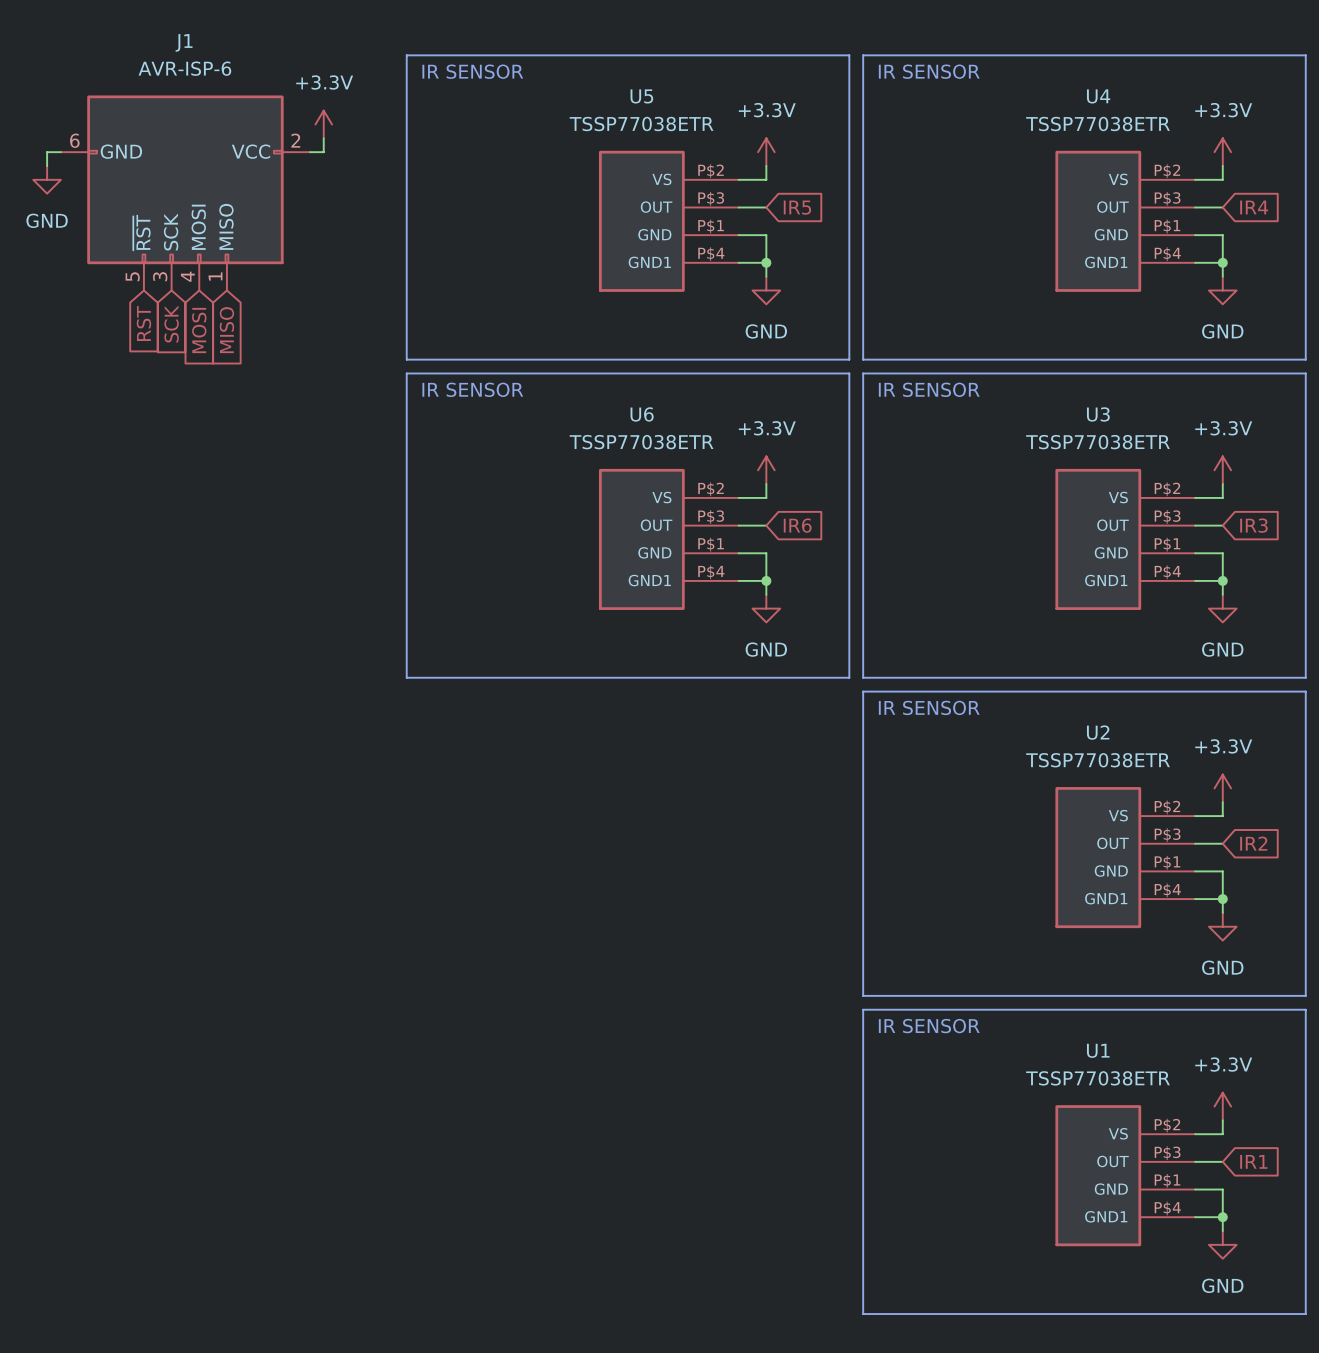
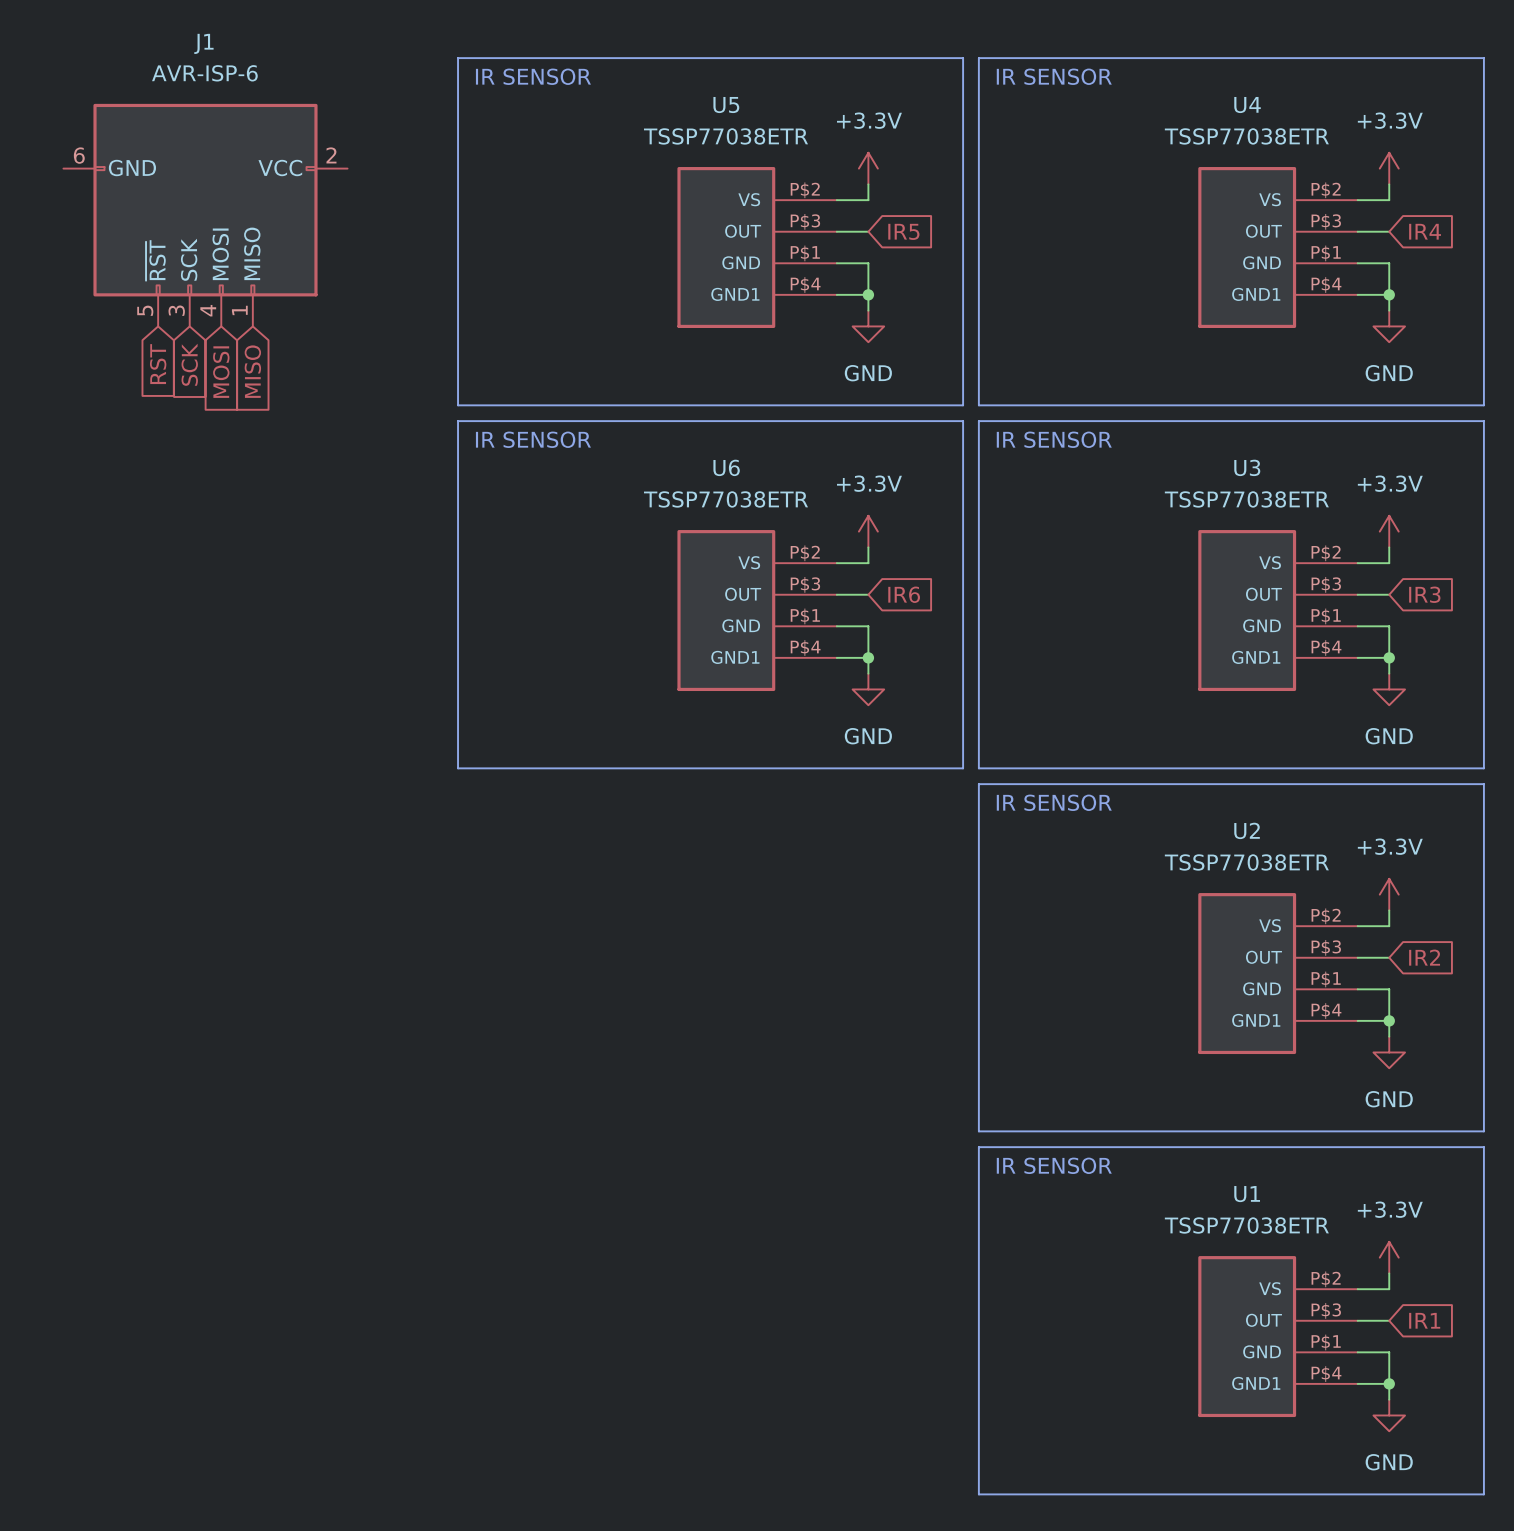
power symbol: +3.3V (323, 124) -> none
wire: (323, 138) (323, 152) (309, 152) -> none
wire: (60, 152) (47, 152) (47, 165) -> none
power symbol: GND (47, 179) -> none

